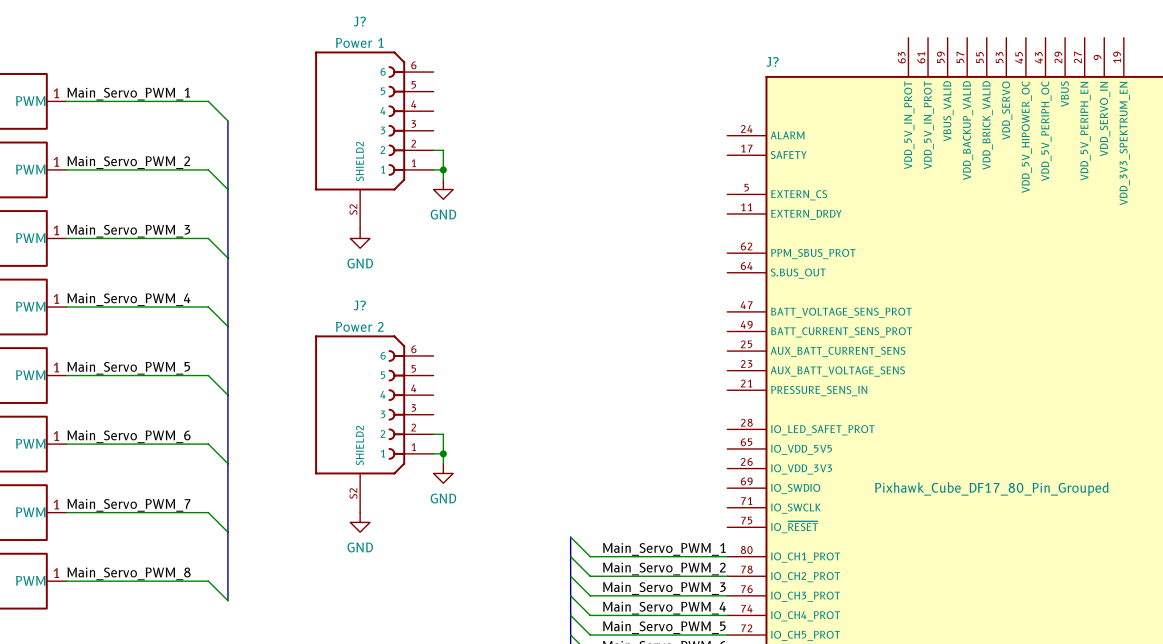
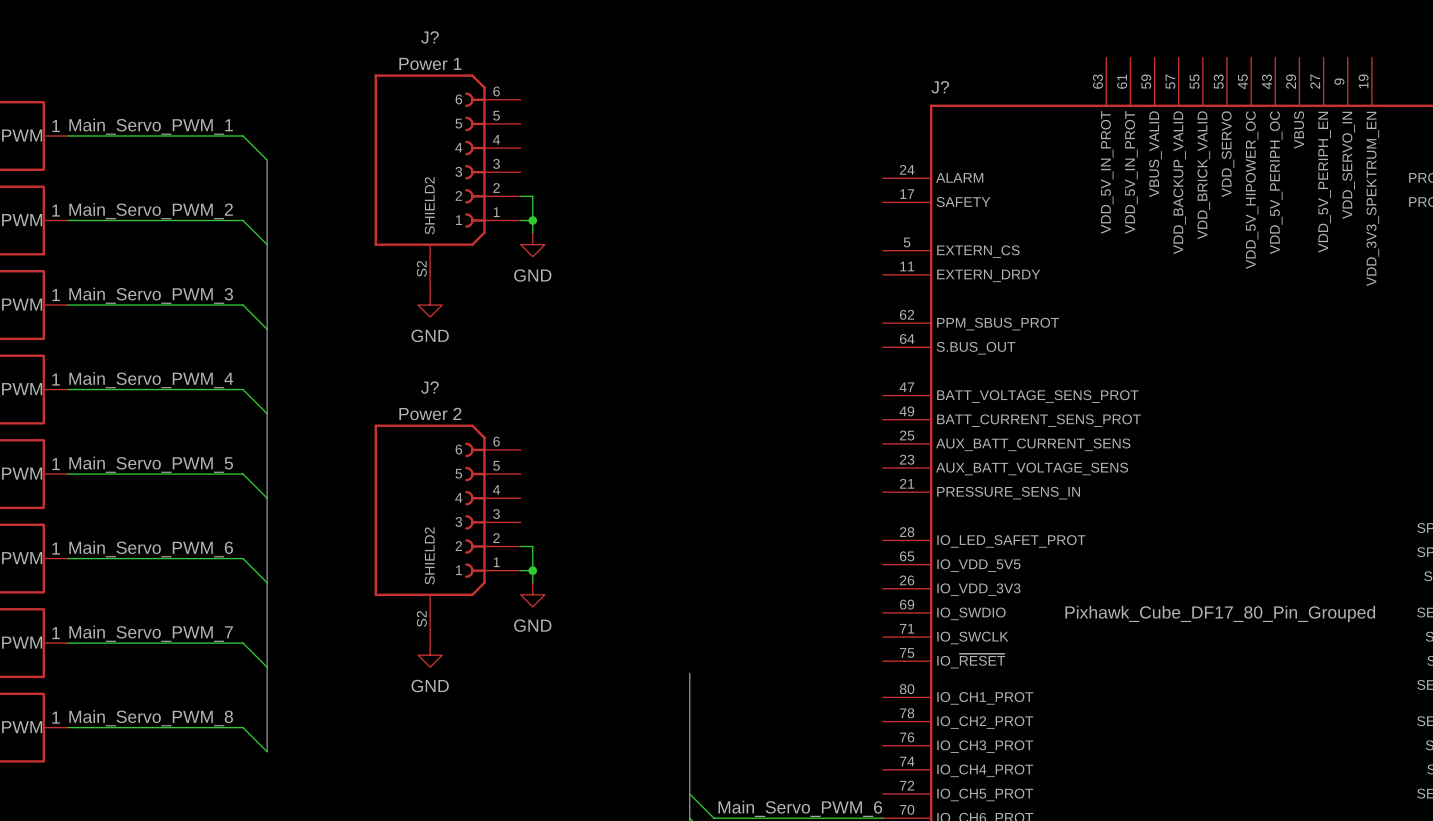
wire: (570, 537) (590, 556) (727, 556) -> none
label: Main_Servo_PWM_1 (664, 549) -> none
wire: (570, 556) (590, 576) (727, 576) -> none
label: Main_Servo_PWM_2 (664, 568) -> none
wire: (570, 576) (590, 595) (727, 595) -> none
label: Main_Servo_PWM_3 (664, 588) -> none
wire: (570, 595) (590, 615) (727, 615) -> none
label: Main_Servo_PWM_4 (664, 608) -> none
wire: (570, 615) (590, 635) (727, 635) -> none
label: Main_Servo_PWM_5 (664, 627) -> none

